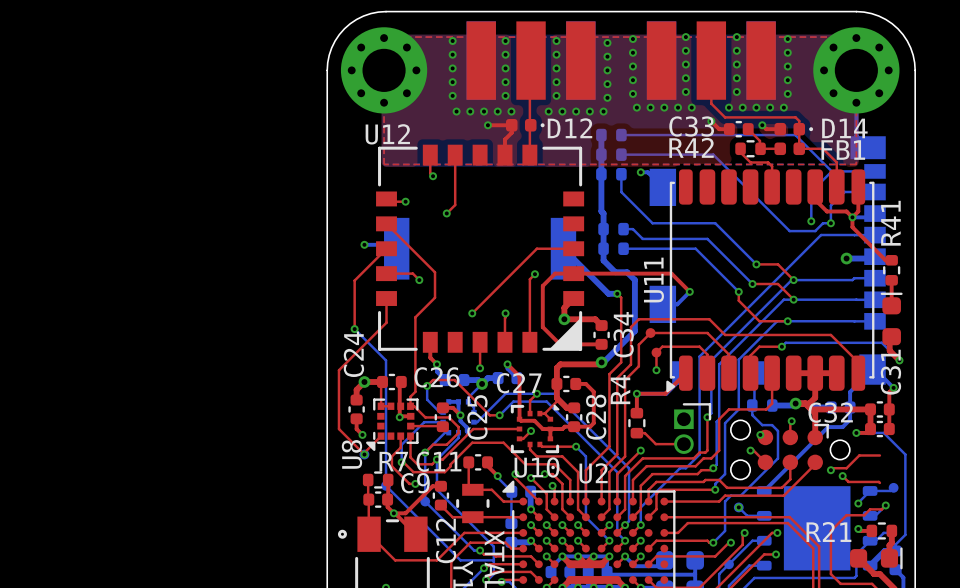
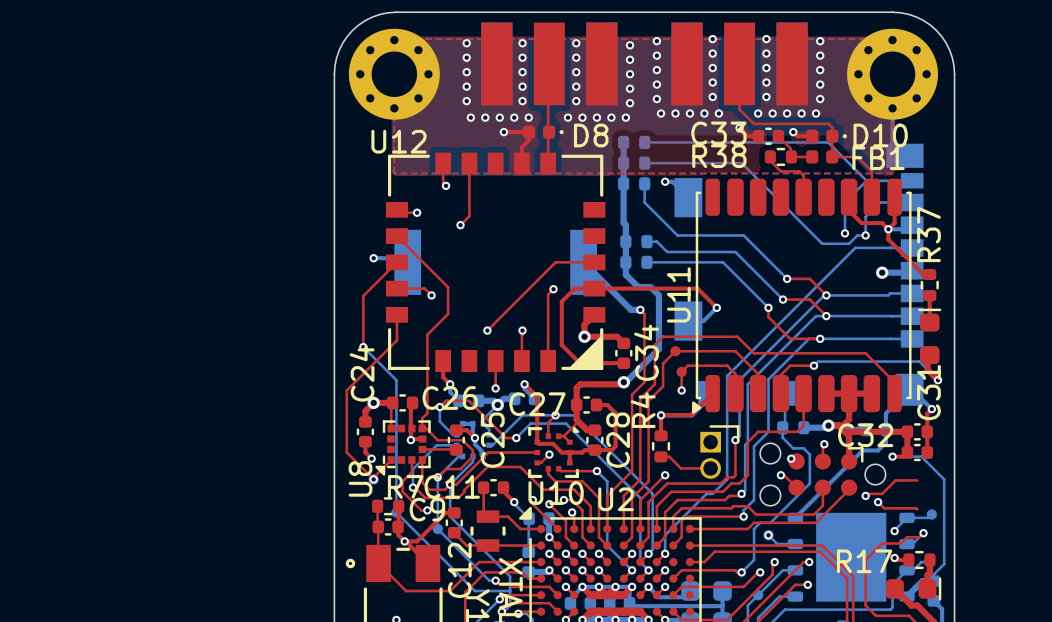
D12 name: D12 (570, 128) -> D8 (591, 135)
D14 name: D14 (844, 128) -> D10 (880, 135)
R42 name: R42 (691, 147) -> R38 (719, 156)
R41 name: R41 (890, 223) -> R37 (928, 234)
R21 name: R21 (828, 532) -> R17 (864, 561)

